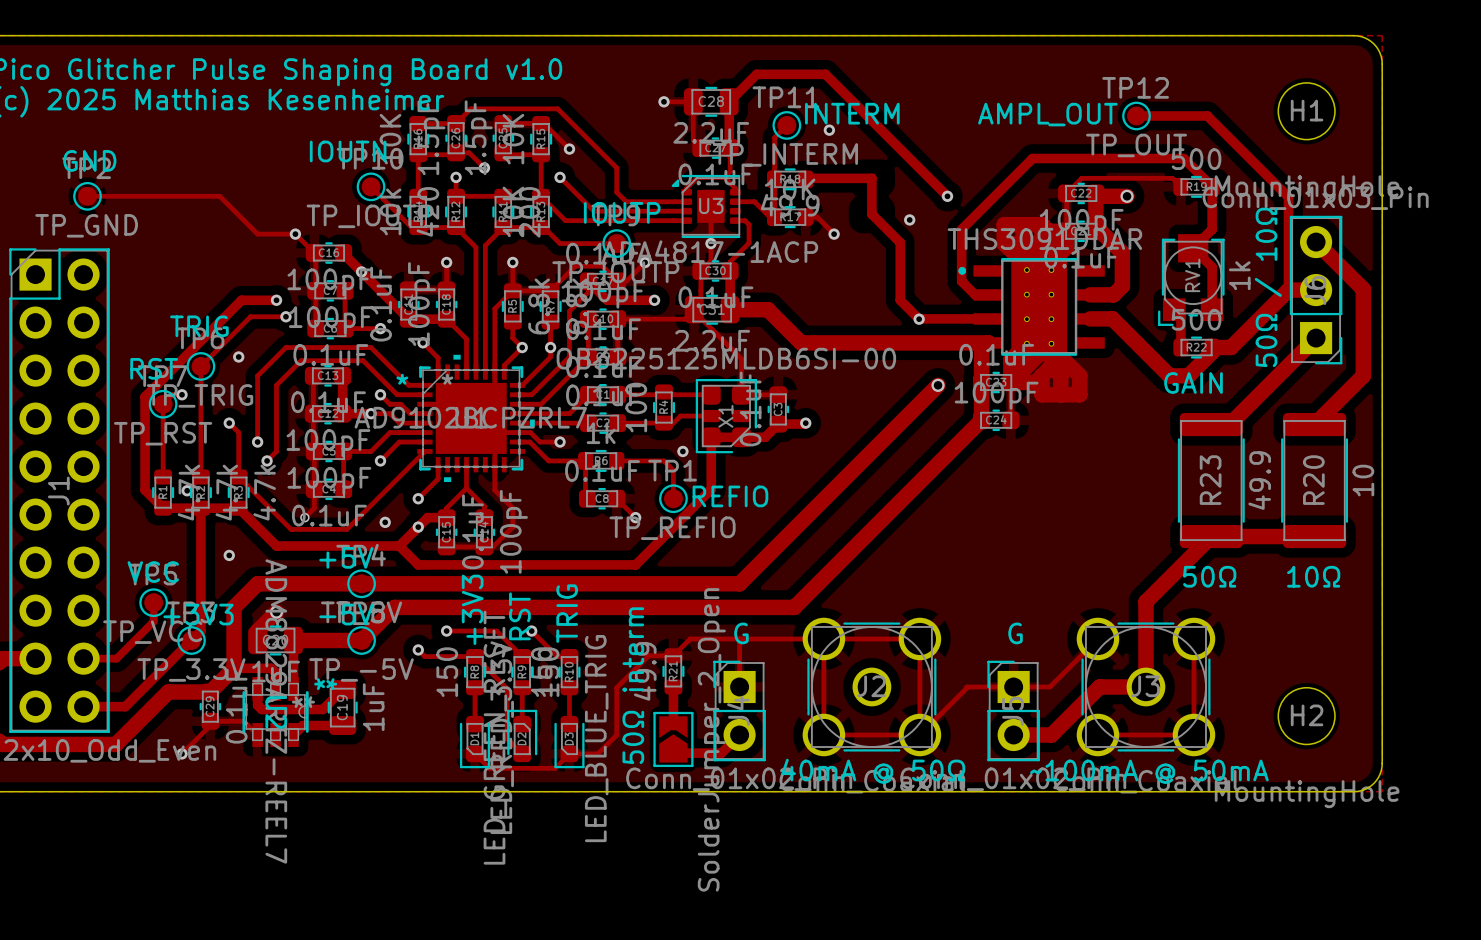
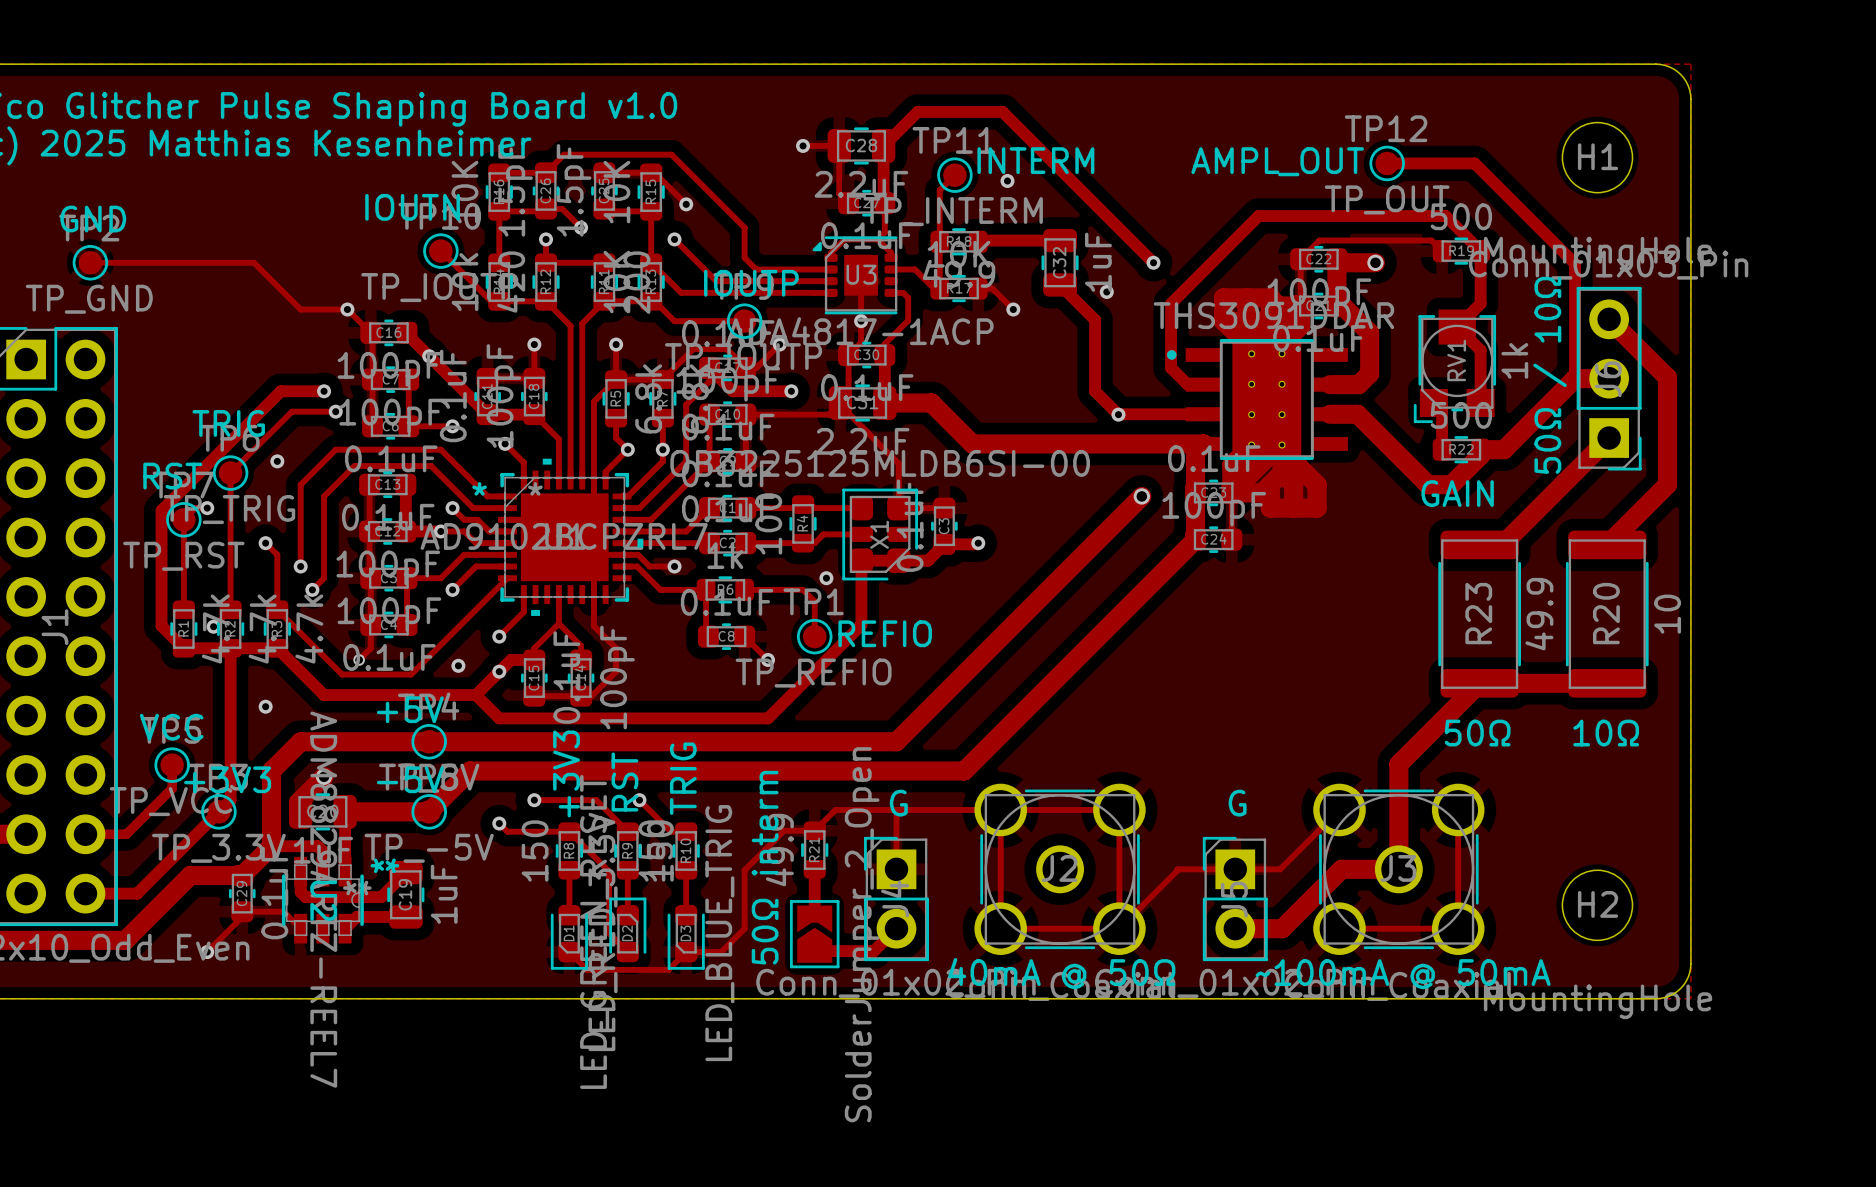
track: (871, 178) (871, 214) -> none
C32: none -> 1uF (1060, 262)

